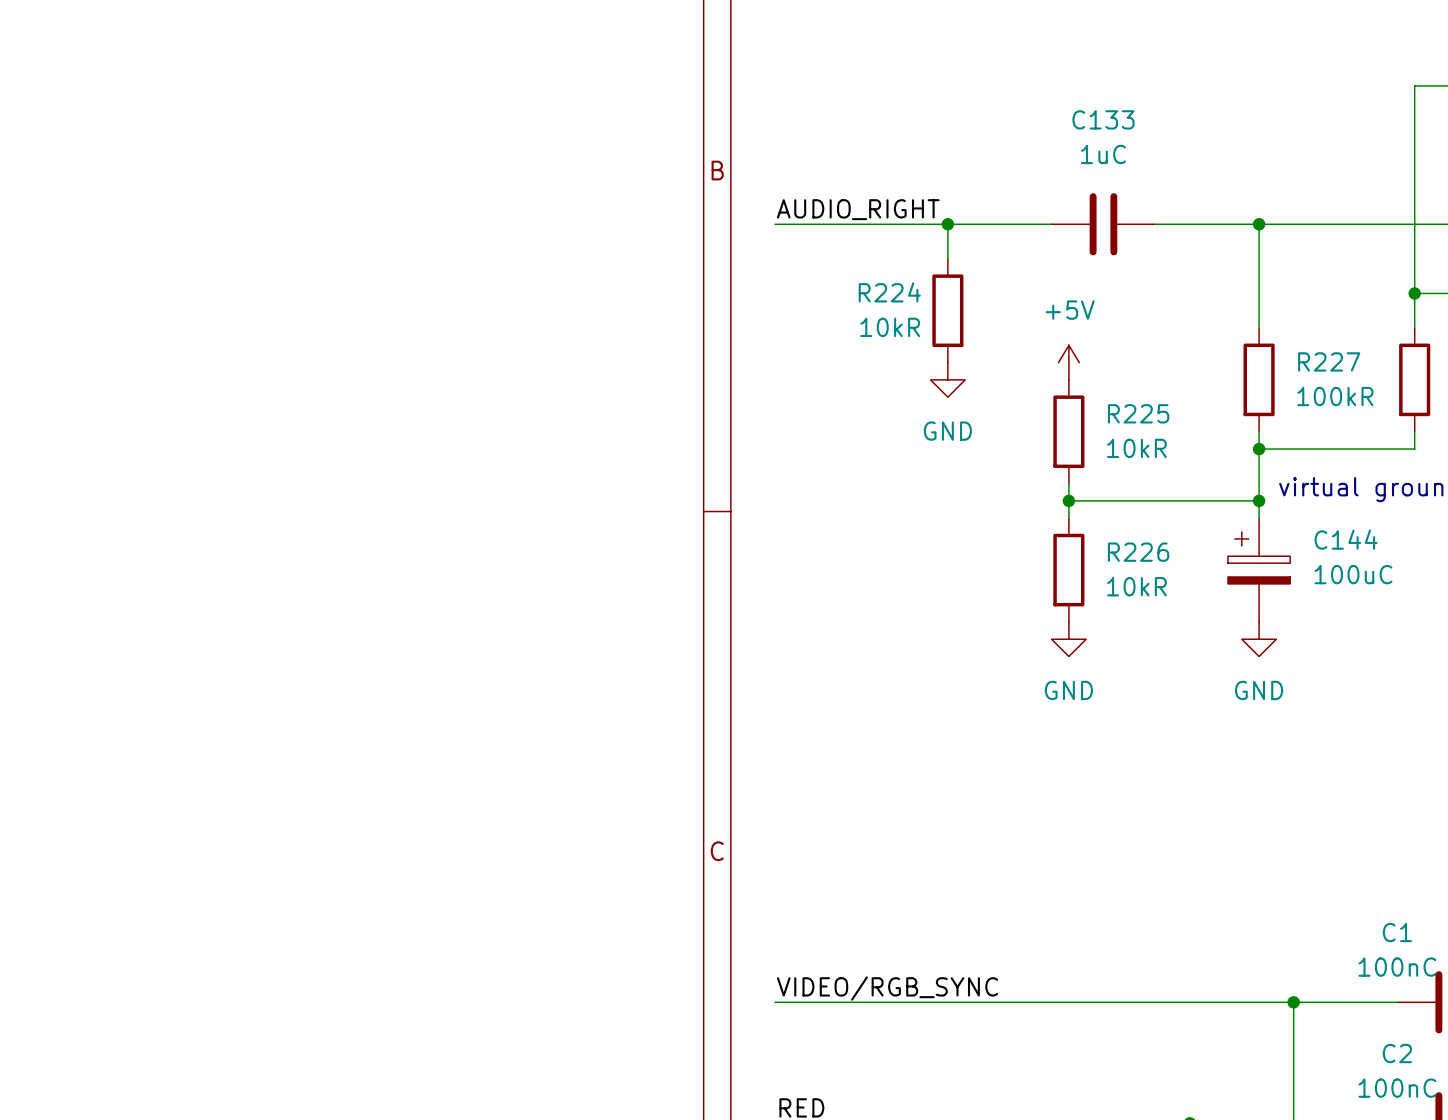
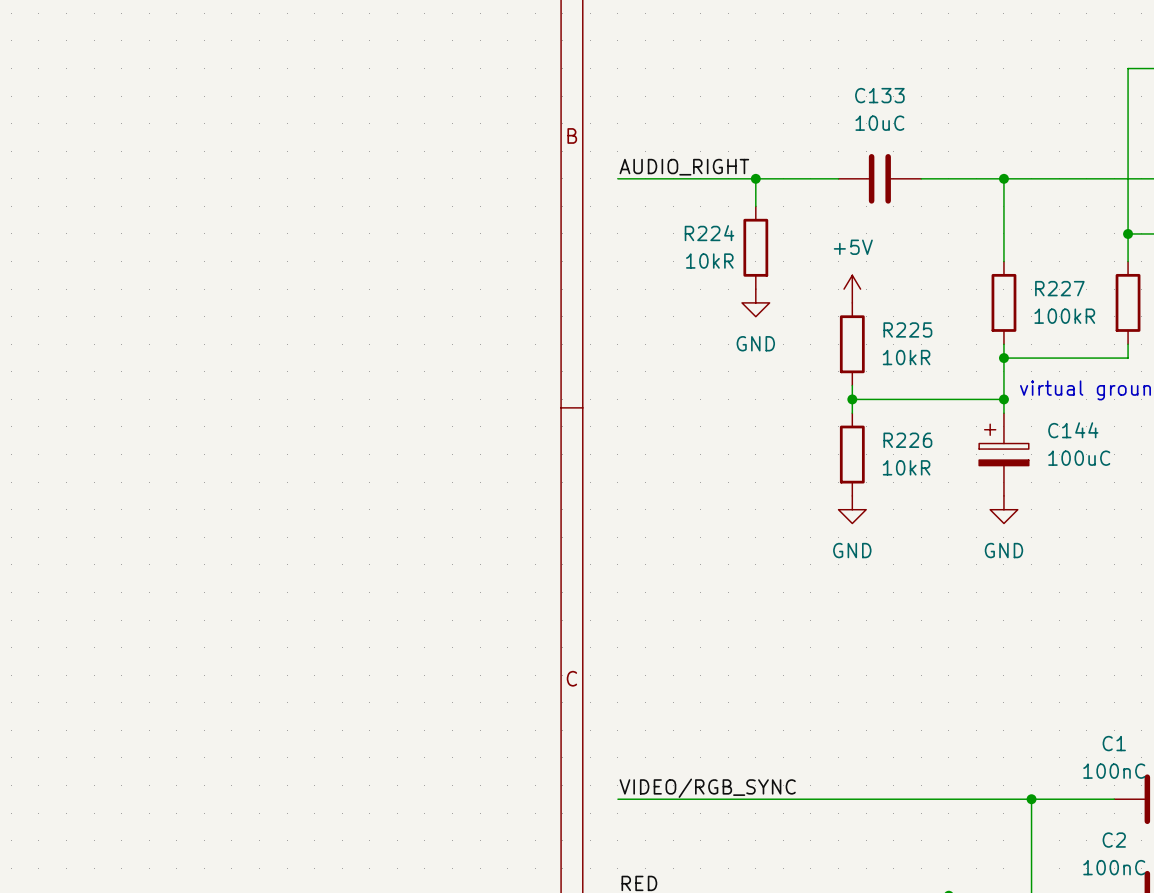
C133 value: 1uC (1103, 154) -> 10uC (879, 123)

